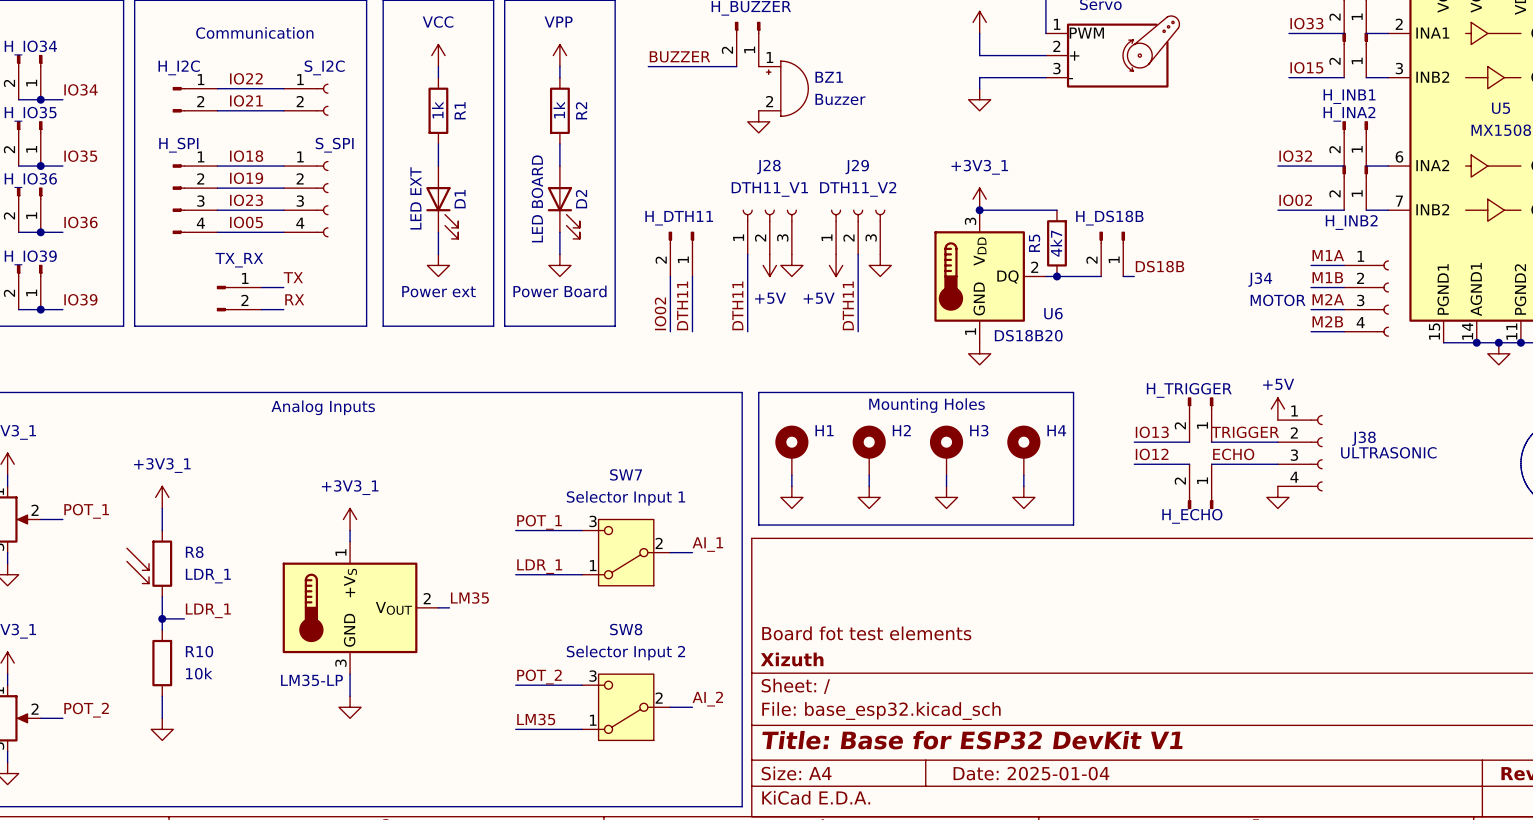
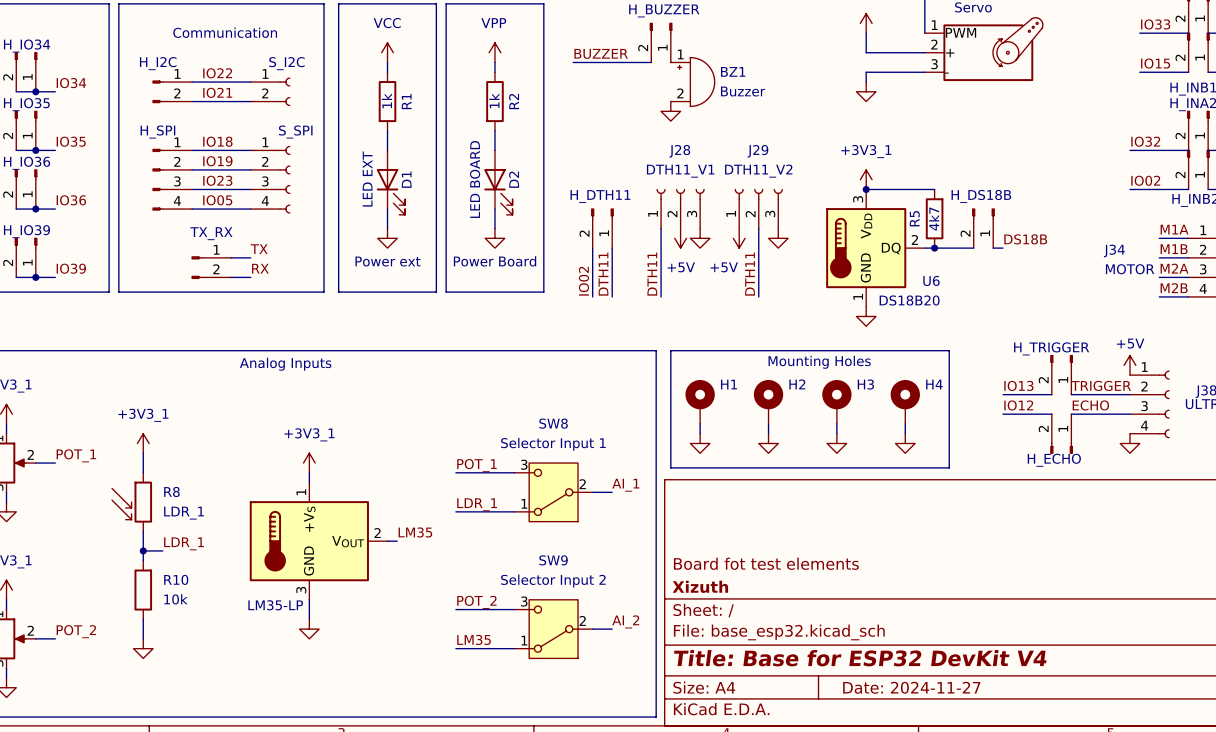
SW7 name: SW7 (626, 474) -> SW8 (553, 423)
SW8 name: SW8 (626, 629) -> SW9 (553, 560)
title block: Title: Base for ESP32 DevKit V1 (972, 740) -> Title: Base for ESP32 DevKit V4 (860, 658)
title block: Date: 2025-01-04 (1031, 773) -> Date: 2024-11-27 (911, 687)

